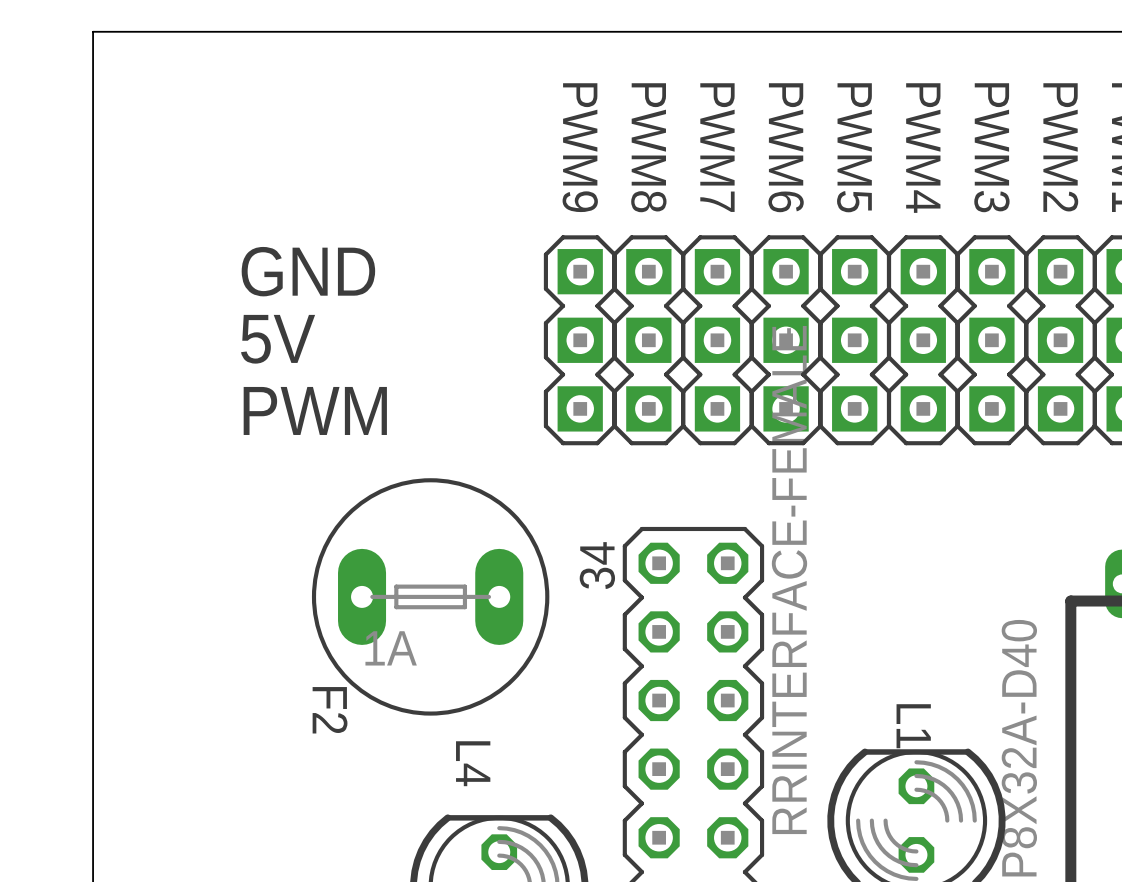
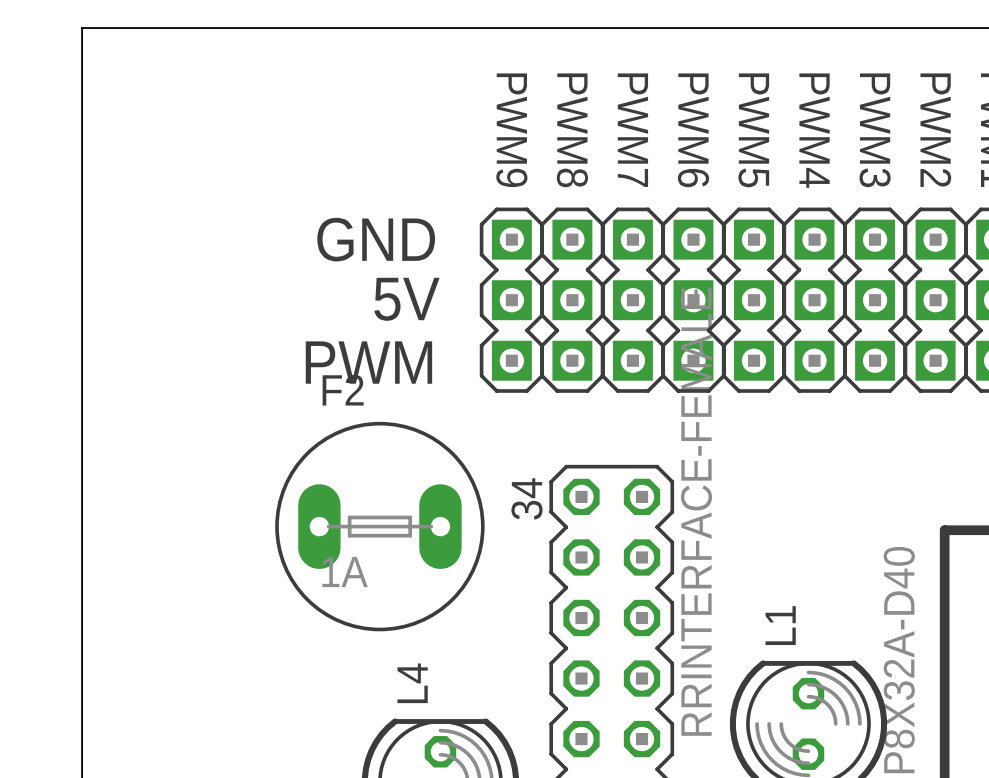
text position: GND (308, 271) -> GND (376, 239)
text position: 5V (278, 339) -> 5V (406, 299)
text position: PWM (315, 410) -> PWM (368, 362)
F2 name rotation: 0° (330, 710) -> 90° counterclockwise (343, 390)
F2 name position: F2 (330, 710) -> F2 (343, 390)
L1 name rotation: 0° (913, 726) -> 180° (780, 625)
L4 name rotation: 0° (473, 763) -> 180° (412, 683)

